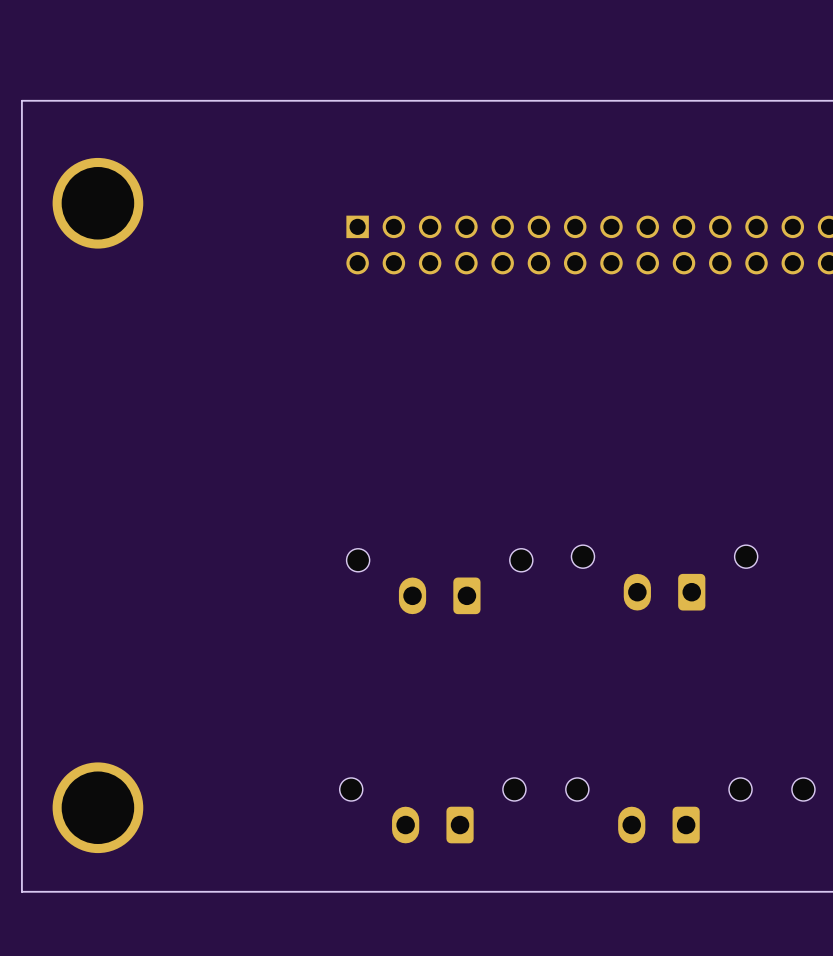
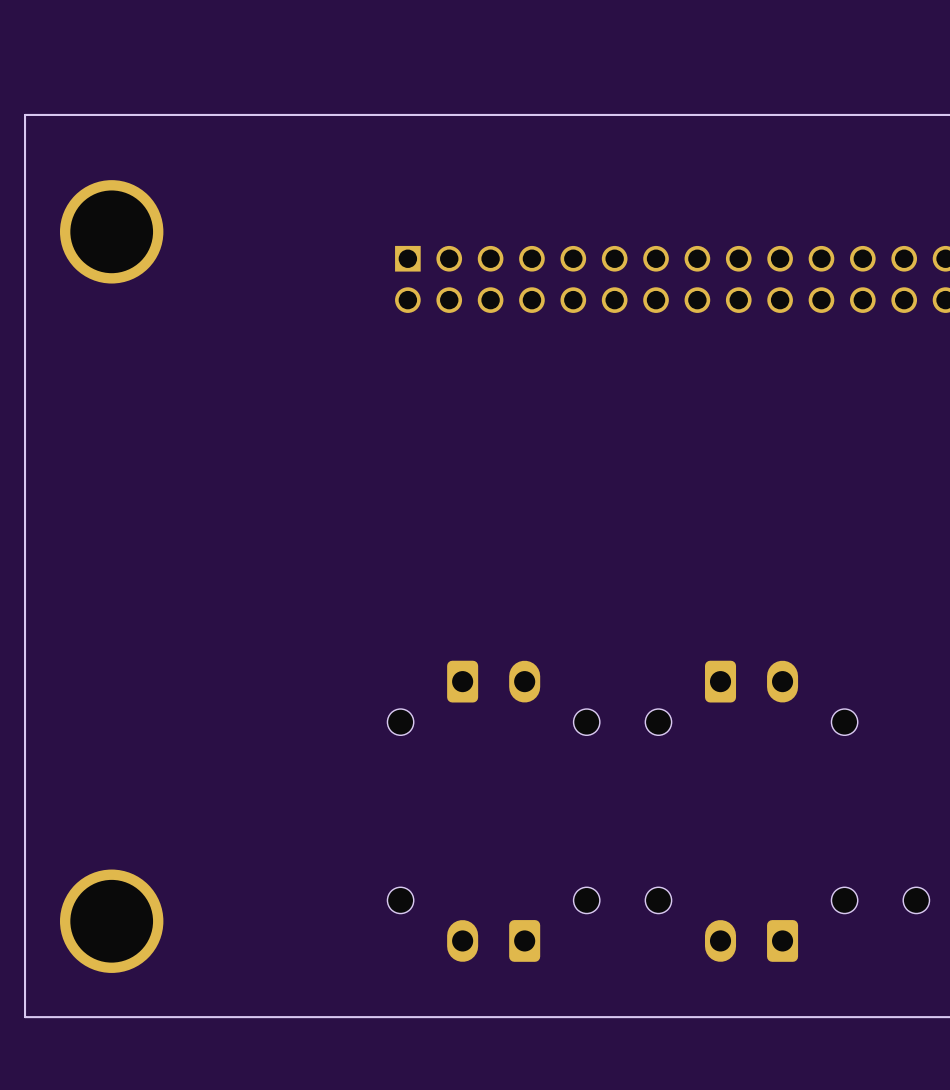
part rotation: 0° (664, 577) -> 180° (751, 698)
part rotation: 0° (439, 581) -> 180° (493, 698)

